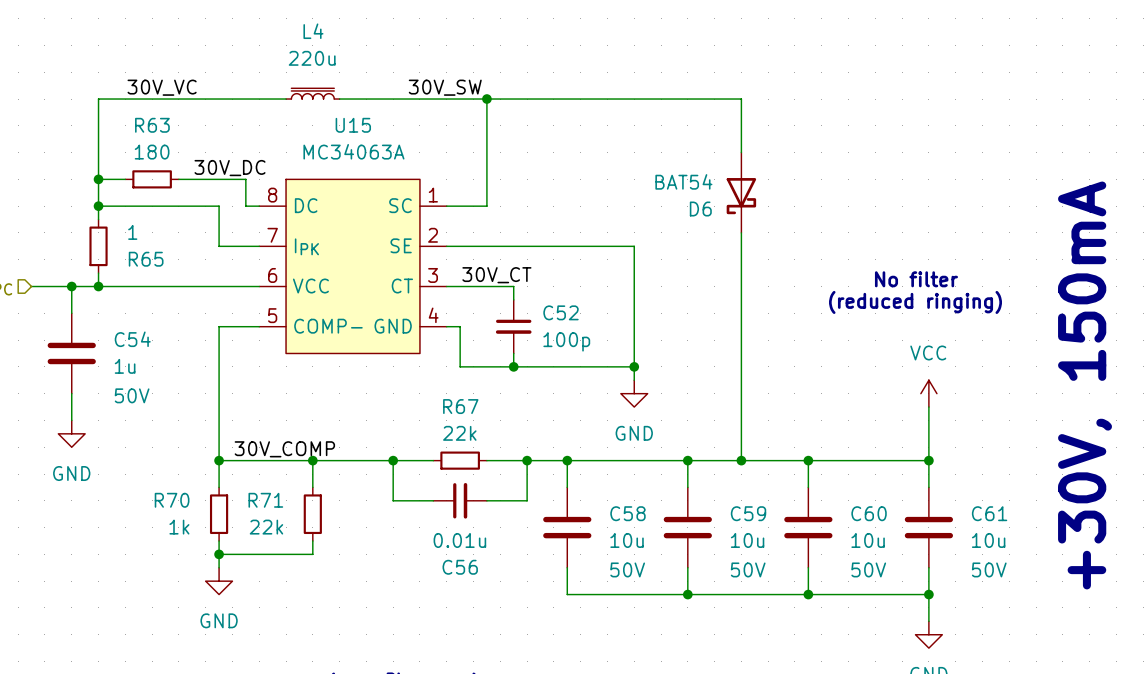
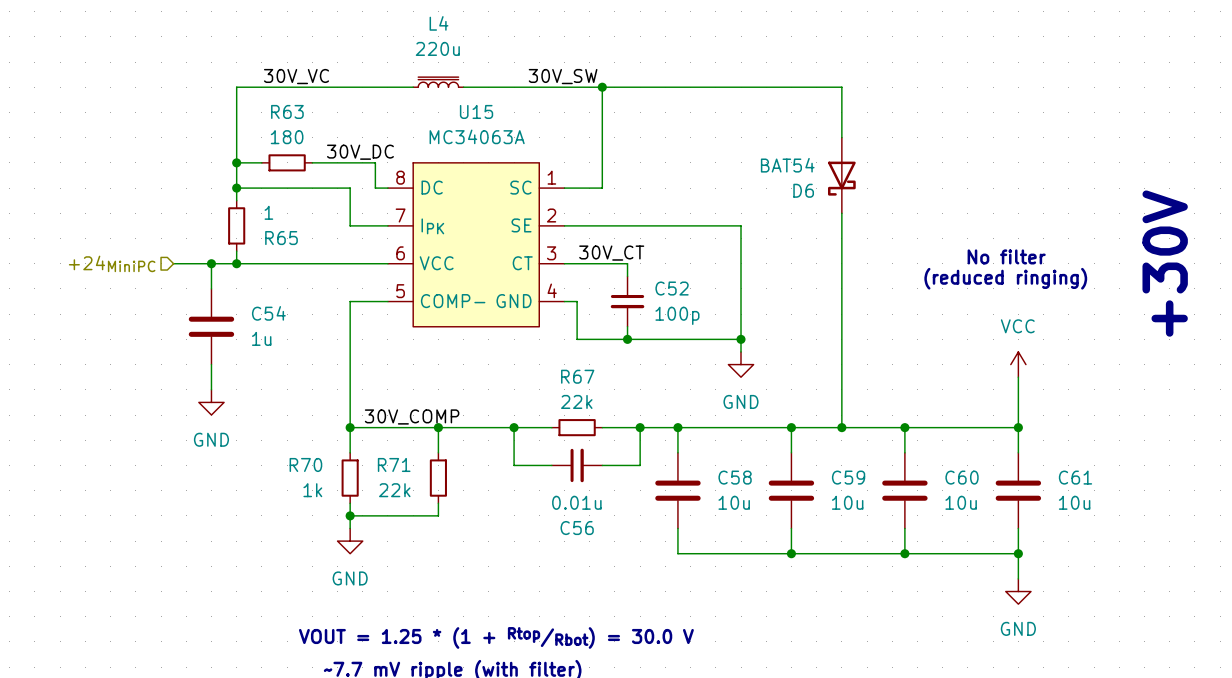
text: none -> +30V (1165, 263)
text: +30V, 150mA (1085, 385) -> none
C54 text: 50V (132, 395) -> none
C58 text: 50V (627, 569) -> none
C59 text: 50V (748, 569) -> none
C60 text: 50V (868, 569) -> none
C61 text: 50V (989, 569) -> none

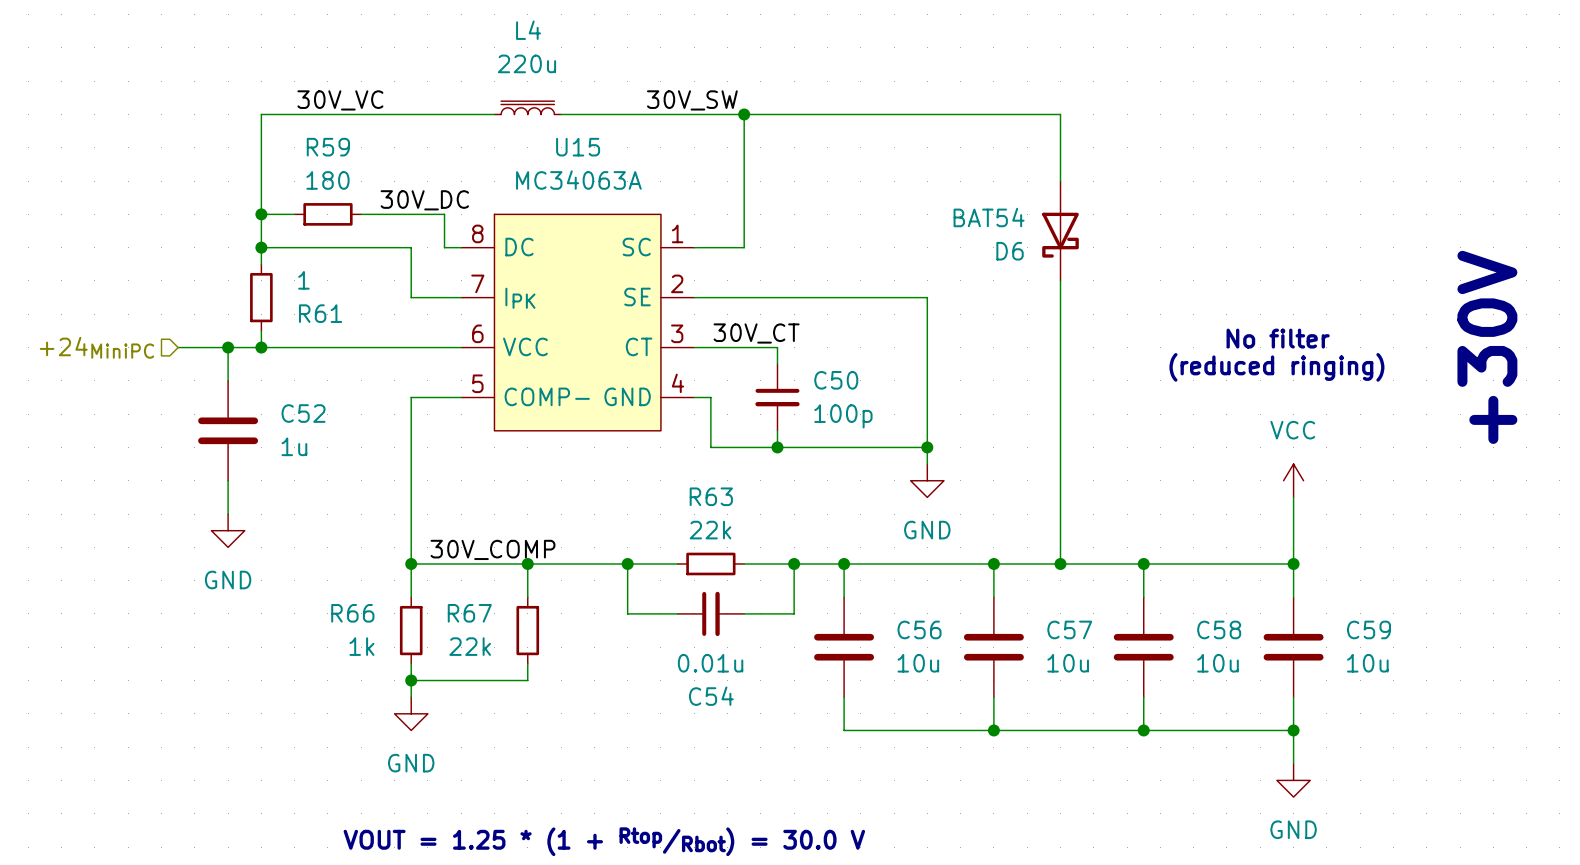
R63 name: R63 (287, 111) -> R59 (328, 147)
R65 name: R65 (281, 238) -> R61 (320, 313)
C52 name: C52 (672, 288) -> C50 (836, 380)
C54 name: C54 (268, 313) -> C52 (303, 413)
R67 name: R67 (577, 376) -> R63 (711, 496)
R70 name: R70 (305, 464) -> R66 (352, 613)
R71 name: R71 (394, 464) -> R67 (469, 613)
C58 name: C58 (735, 477) -> C56 (919, 629)
C59 name: C59 (848, 477) -> C57 (1069, 629)
C60 name: C60 (962, 477) -> C58 (1219, 629)
C61 name: C61 (1075, 477) -> C59 (1369, 629)
C56 name: C56 (577, 528) -> C54 (711, 696)

